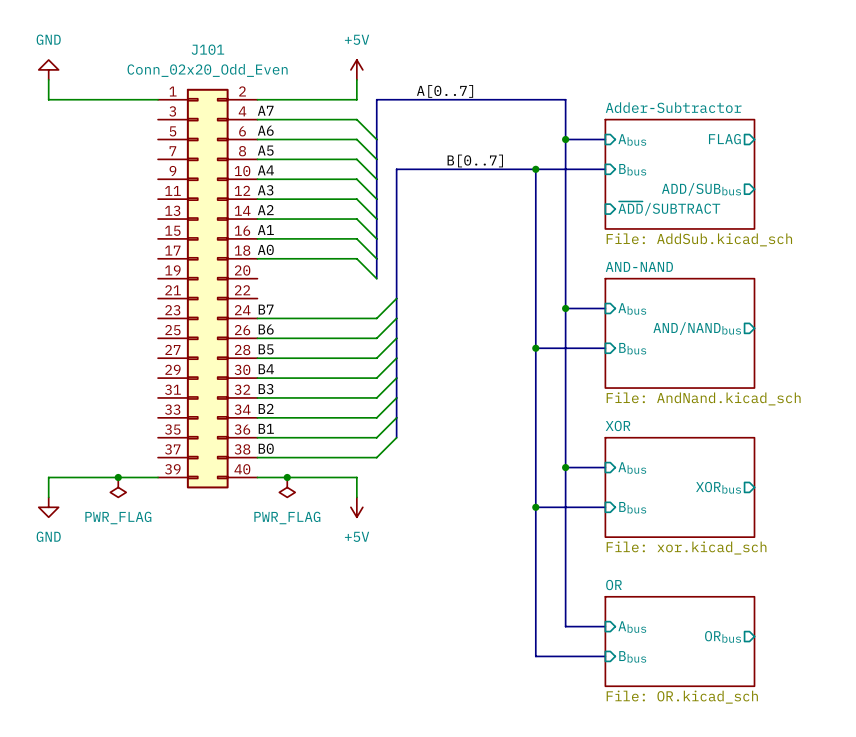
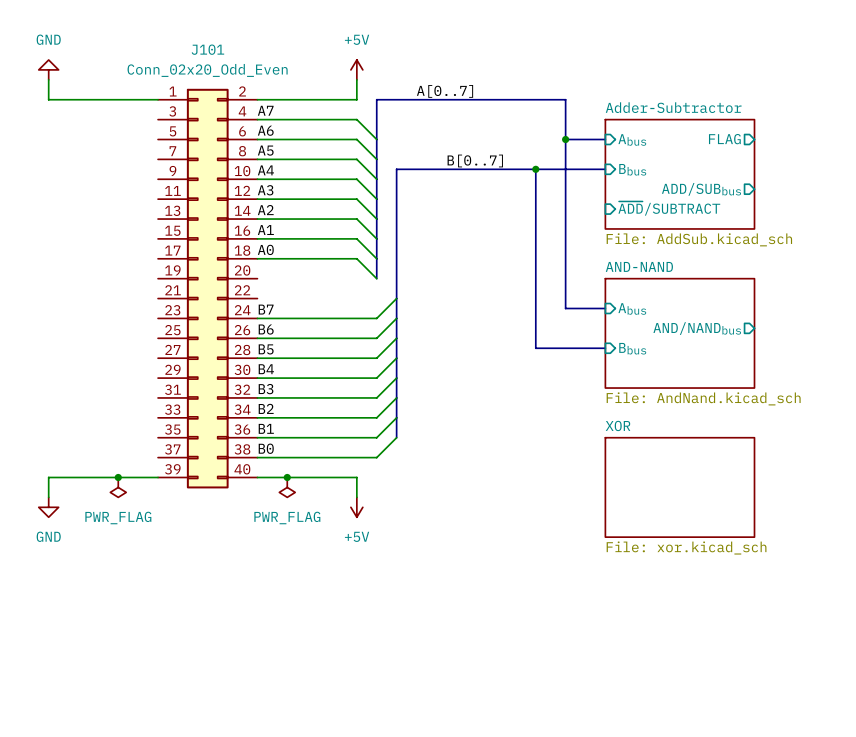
bus: (565, 308) (565, 626) (605, 626) -> none
junction: (565, 308) -> none
bus: (535, 348) (535, 656) (605, 656) -> none
junction: (535, 348) -> none
bus: (565, 467) (605, 467) -> none
junction: (565, 467) -> none
sheet pin: Abus (632, 467) -> none
sheet pin: XORbus (718, 487) -> none
bus: (535, 507) (605, 507) -> none
junction: (535, 507) -> none
sheet pin: Bbus (632, 507) -> none
sheet pin: Abus (632, 627) -> none
sheet pin: ORbus (723, 636) -> none
sheet OR: File: OR.kicad_sch (679, 641) -> none
sheet pin: Bbus (632, 656) -> none

